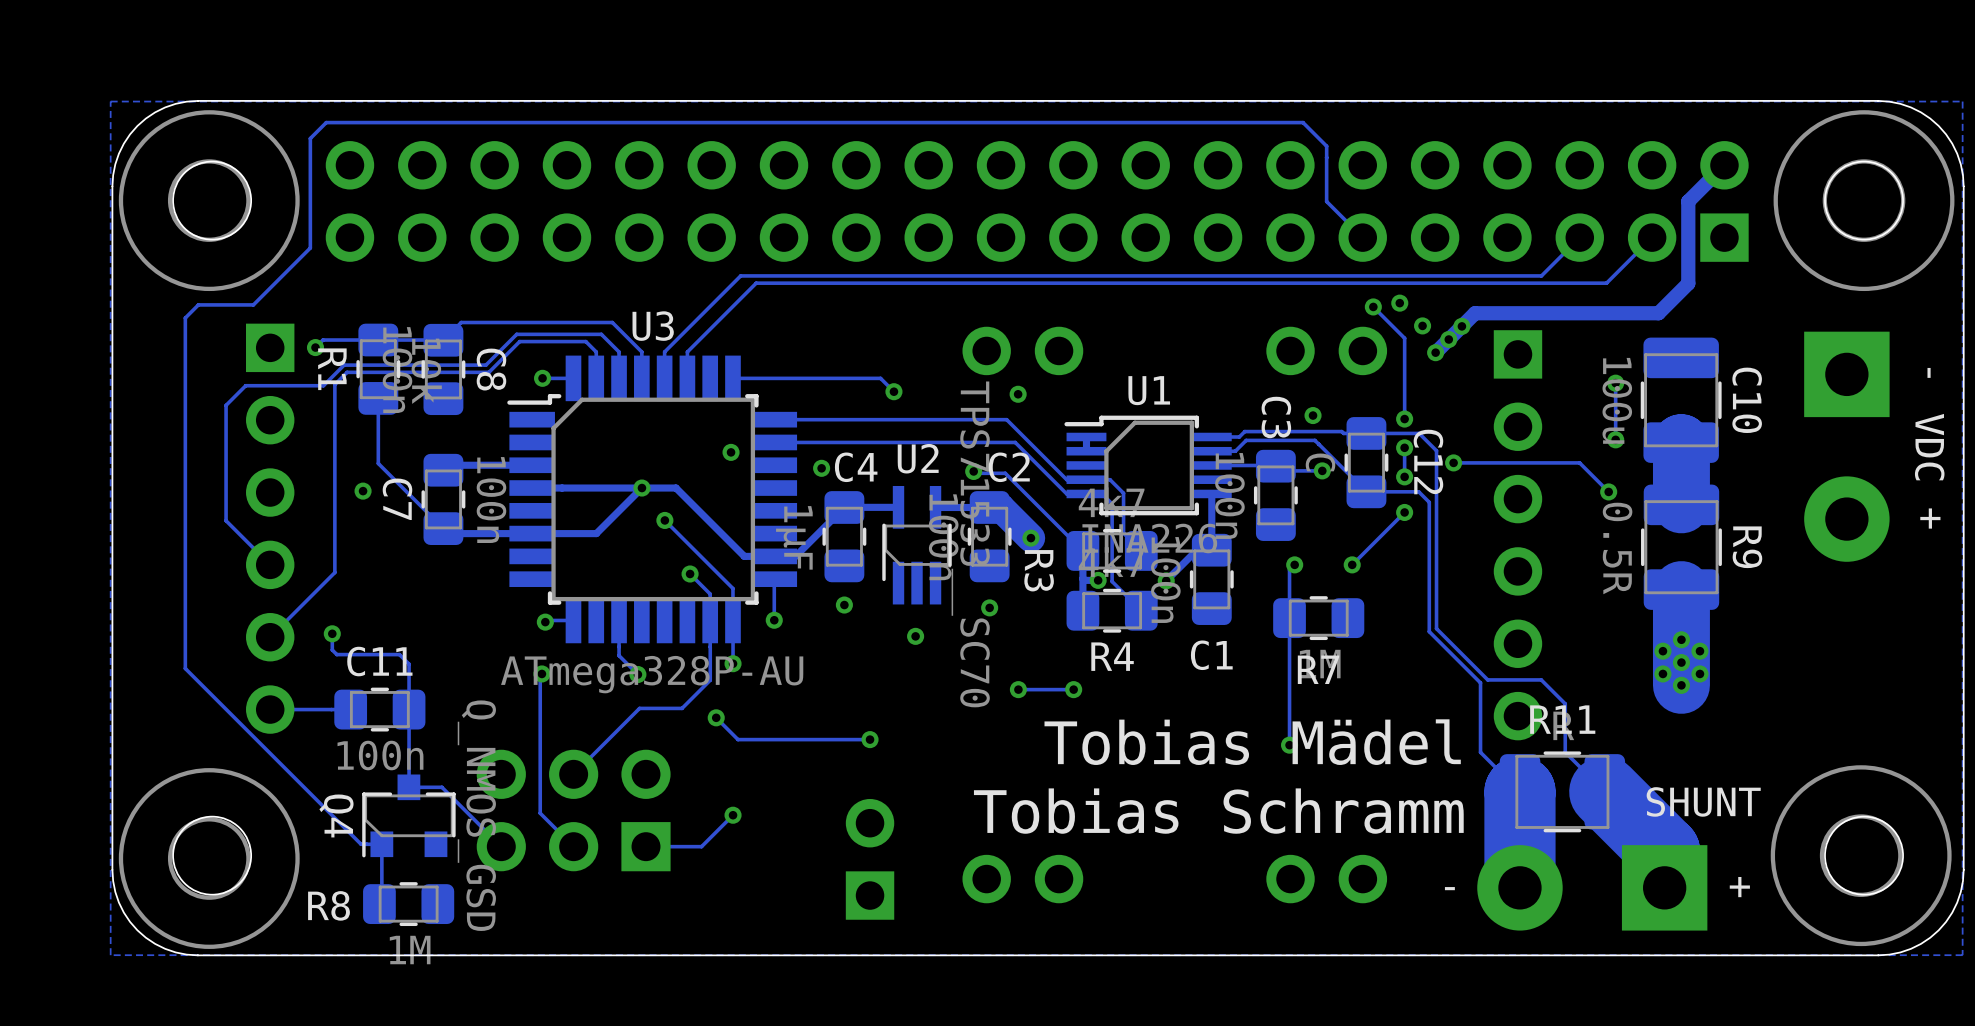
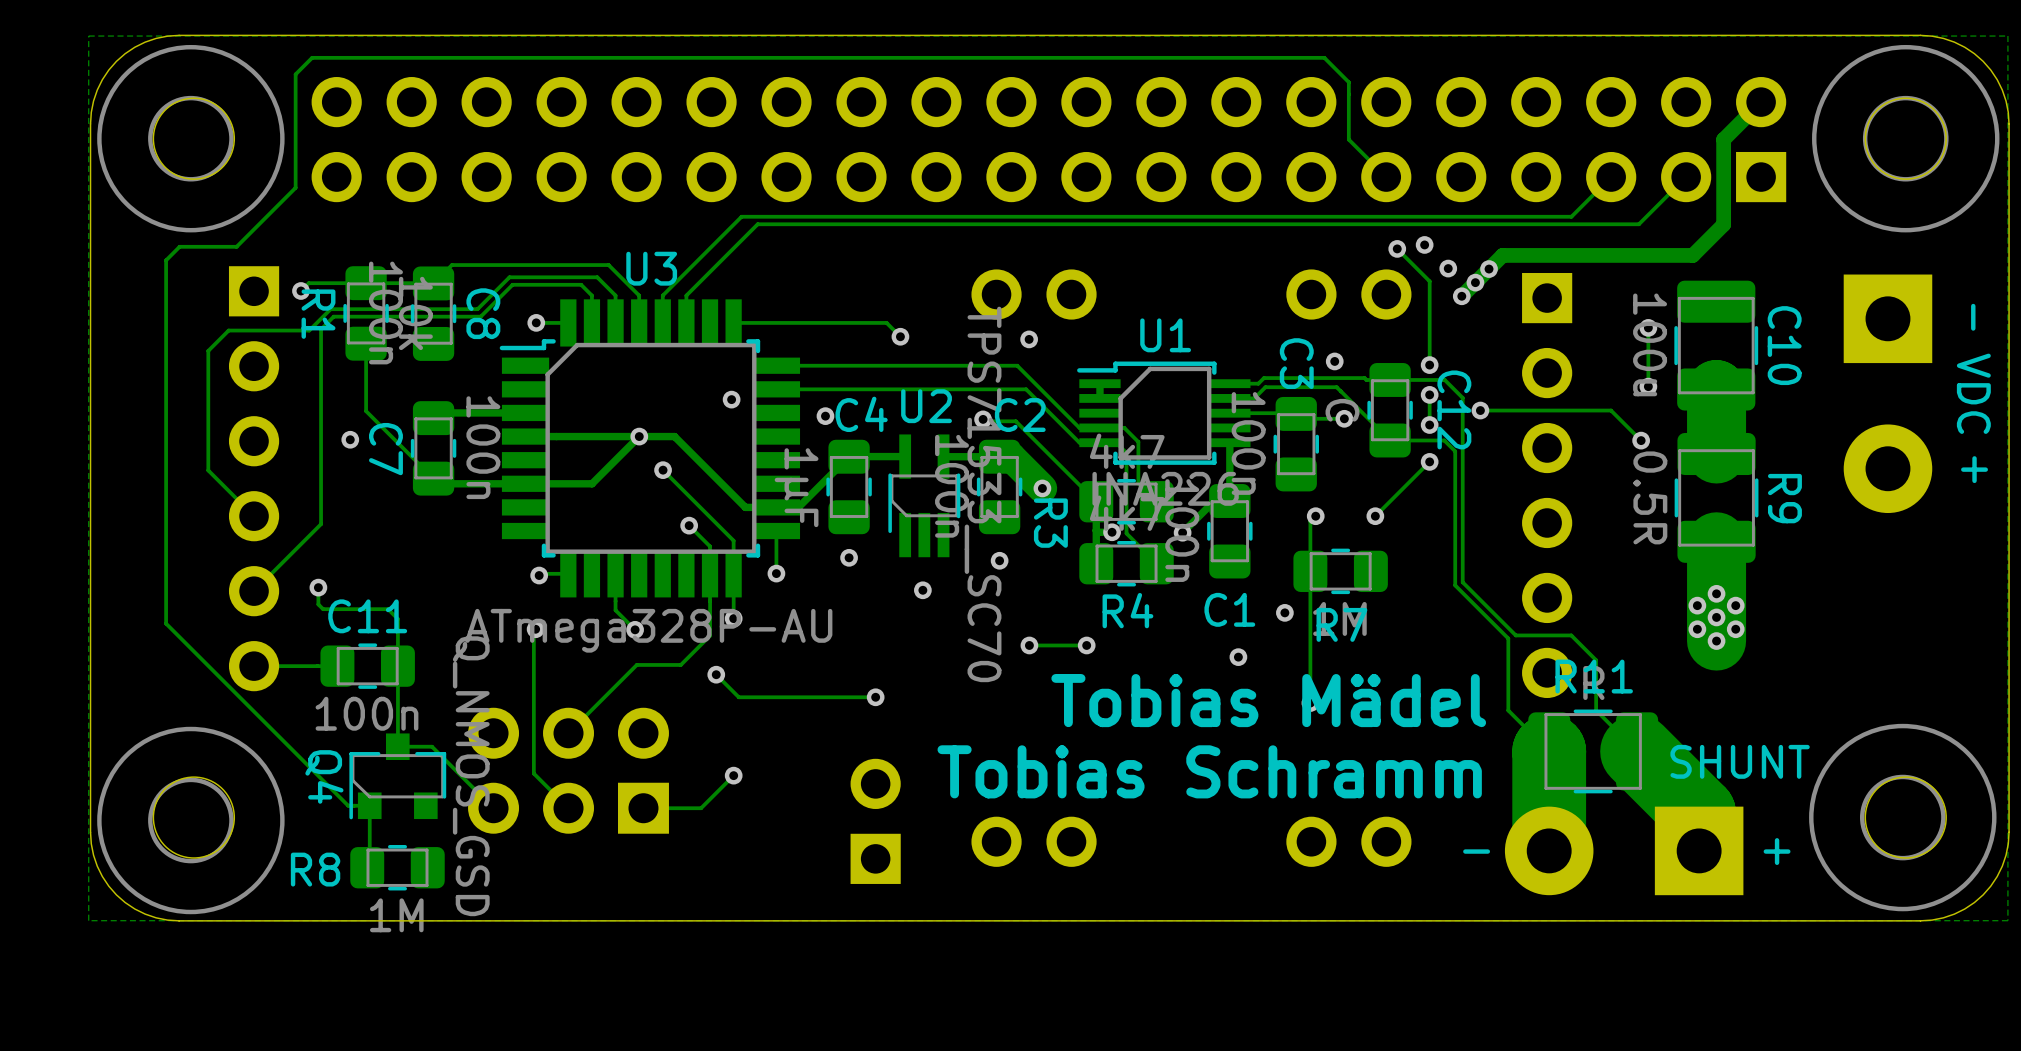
via: none -> (1284, 612)
via: none -> (1238, 657)

